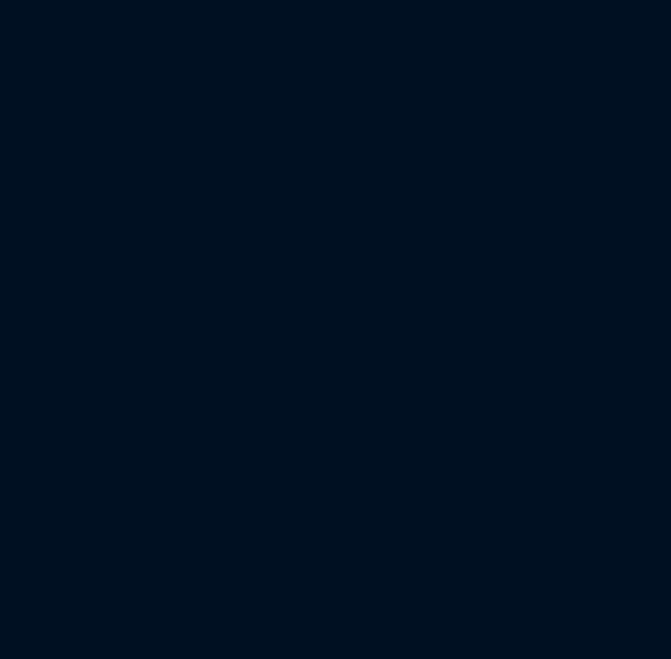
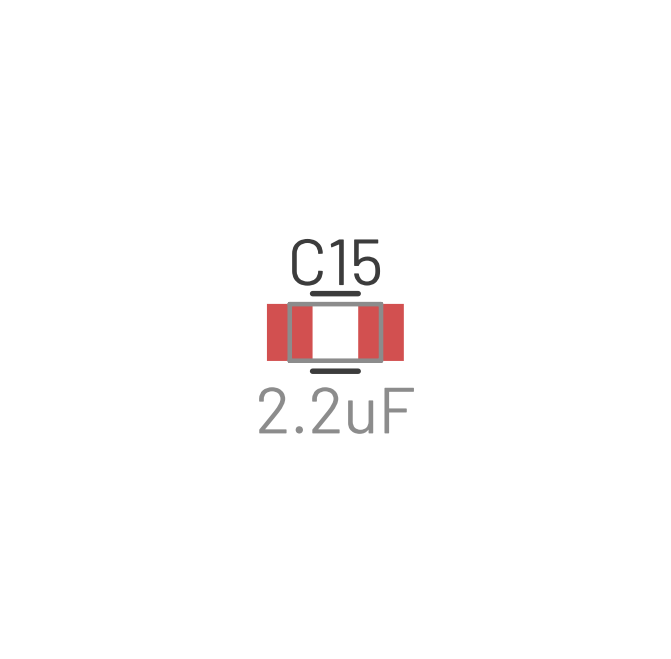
C15: none -> 2.2uF (335, 332)

